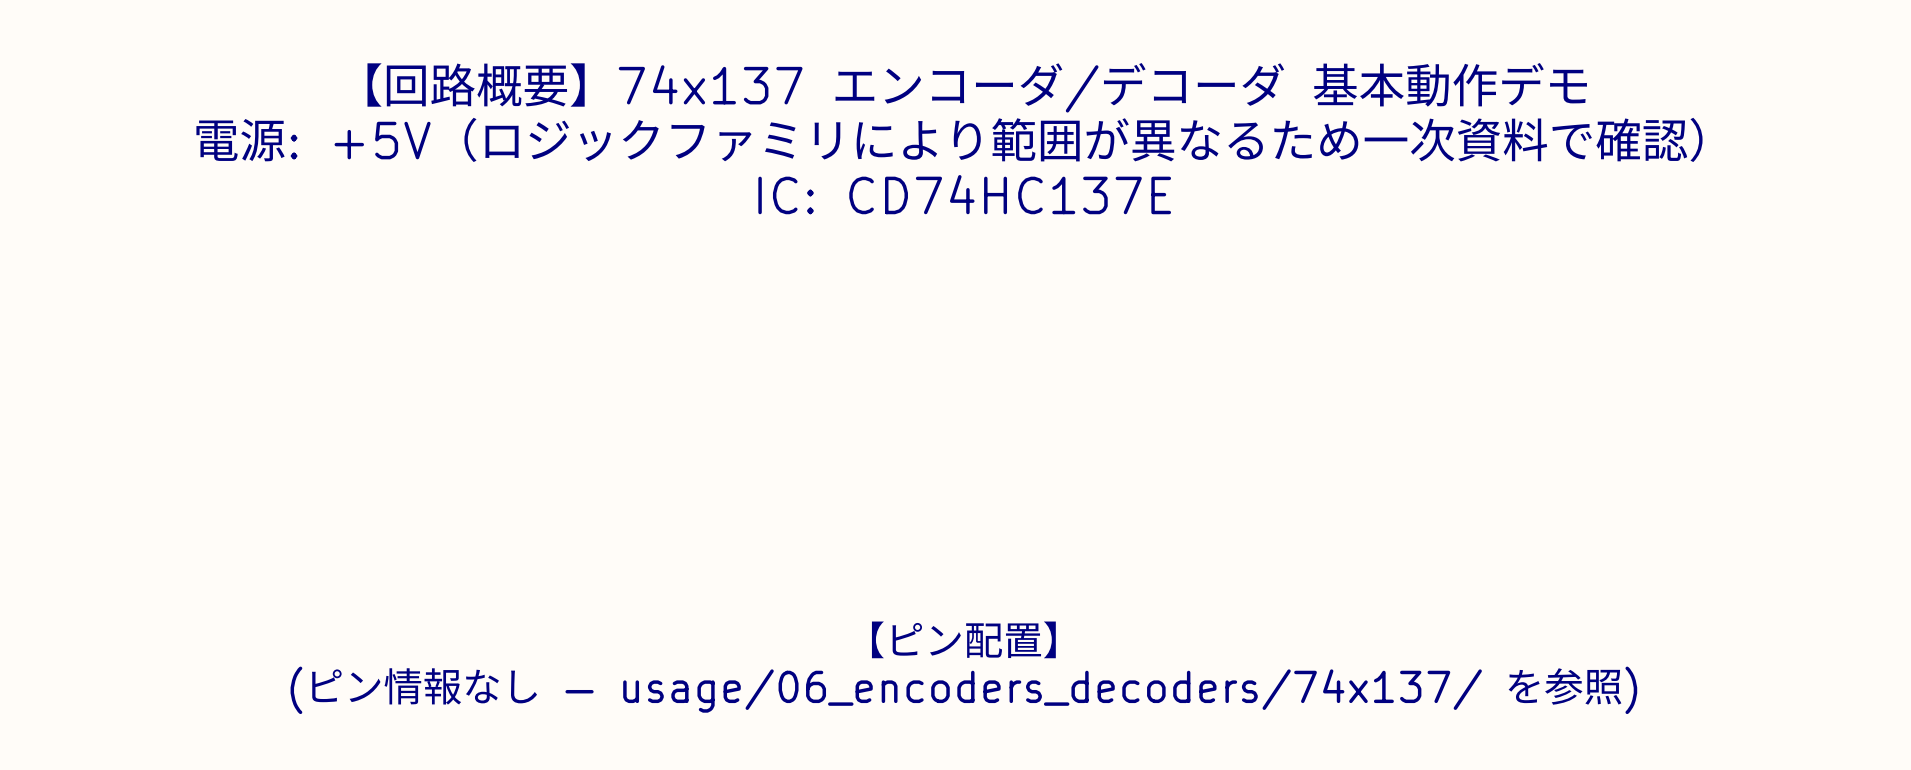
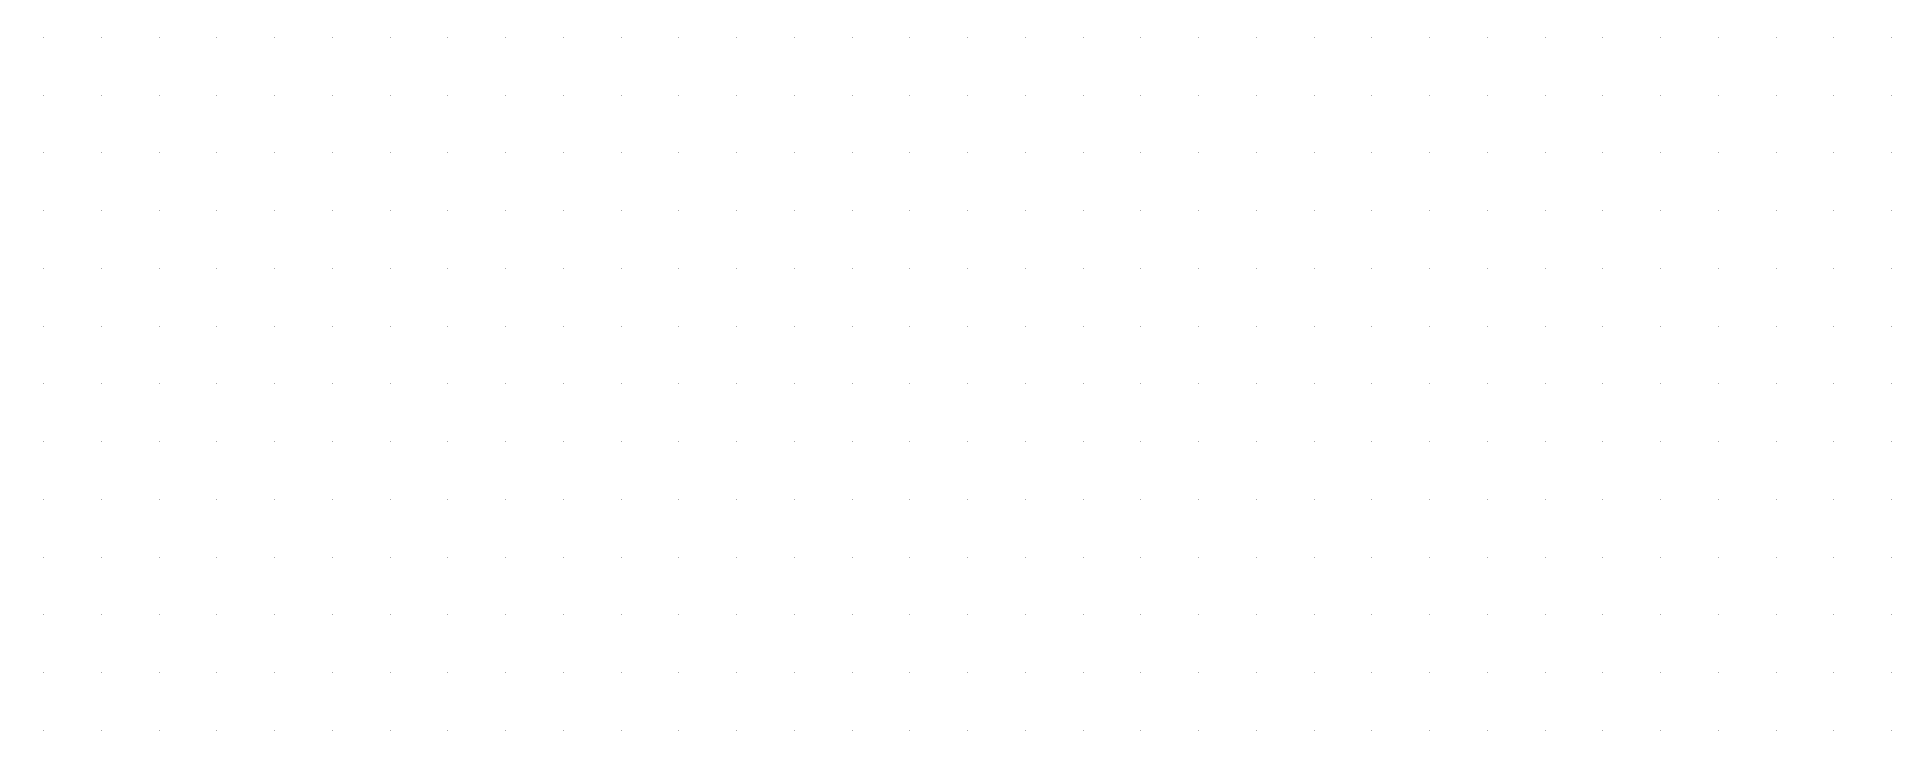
text: 【回路概要】74x137 エンコーダ/デコーダ 基本動作デモ (977, 86) -> none
text: 電源: +5V（ロジックファミリにより範囲が異なるため一次資料で確認） (949, 139) -> none
text: IC: CD74HC137E (964, 194) -> none
text: 【ピン配置】 (963, 639) -> none
text: (ピン情報なし — usage/06_encoders_decoders/74x137/ を参照) (963, 690) -> none

